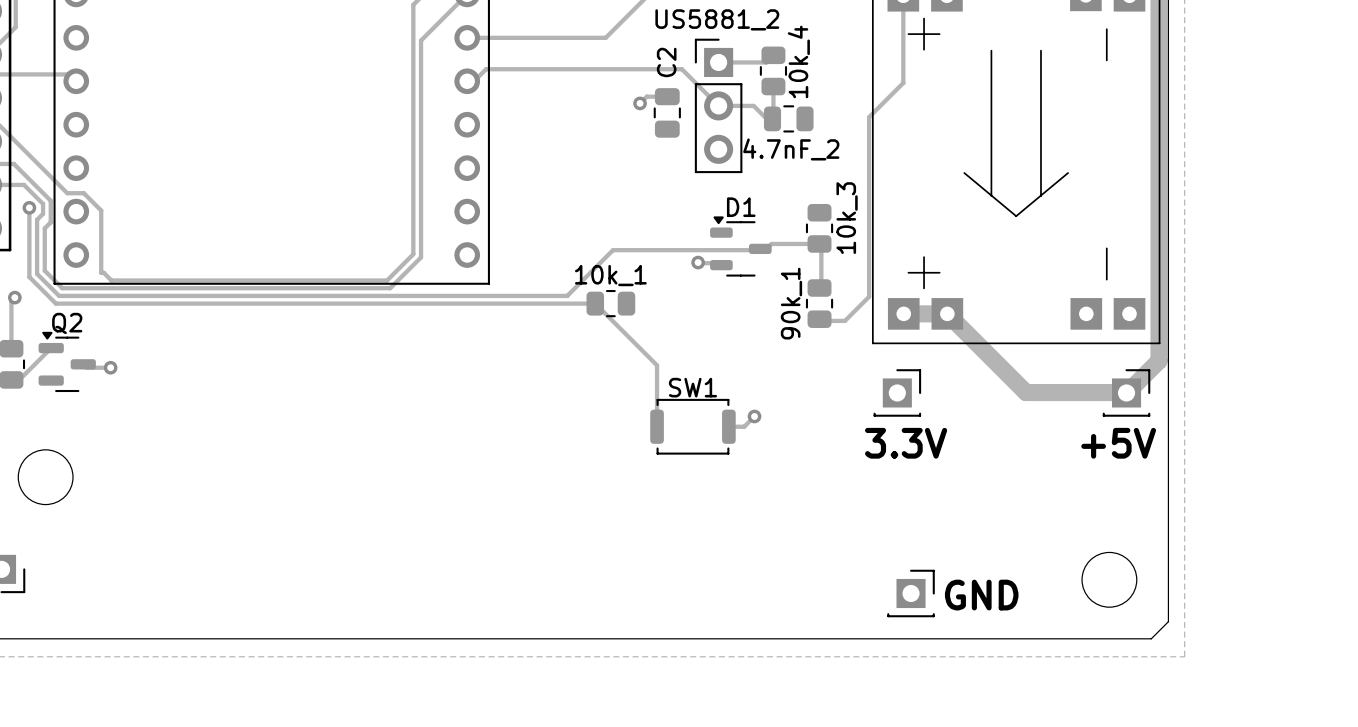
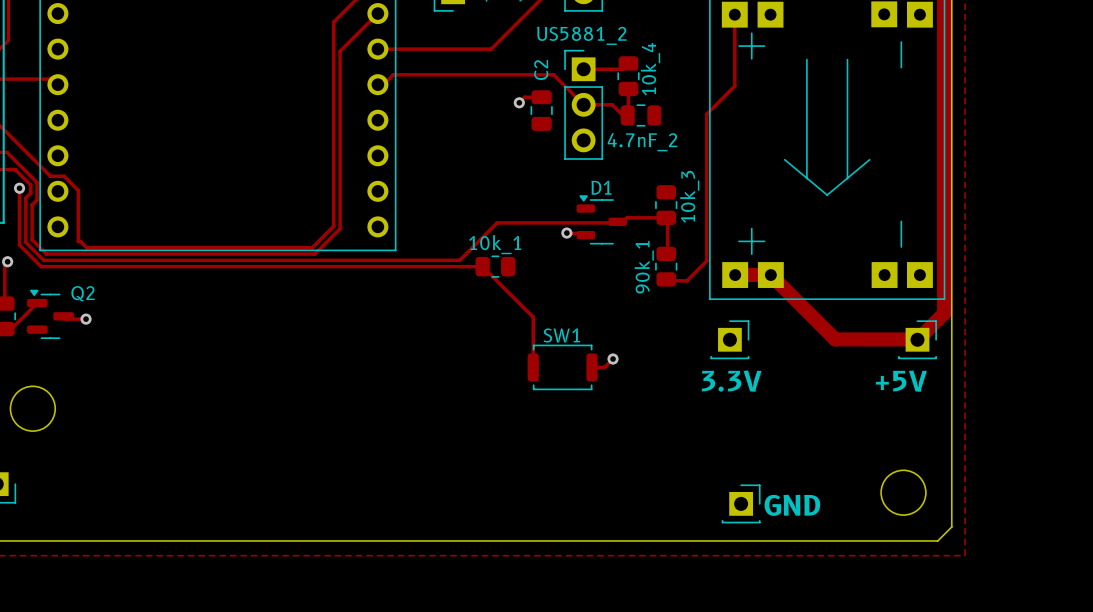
Q2 name position: Q2 (67, 323) -> Q2 (83, 293)

